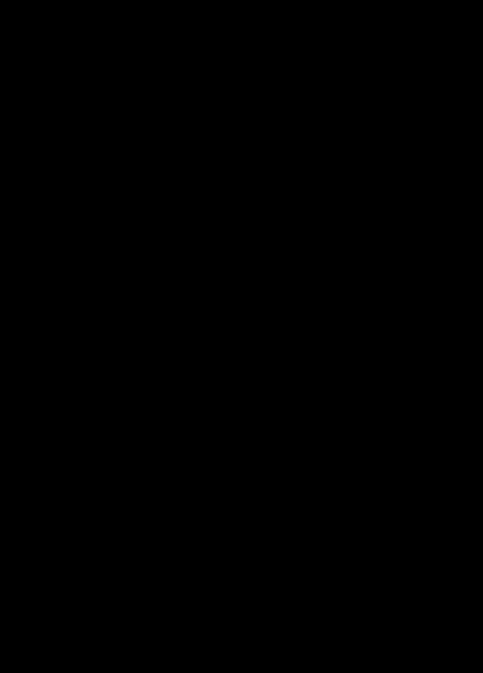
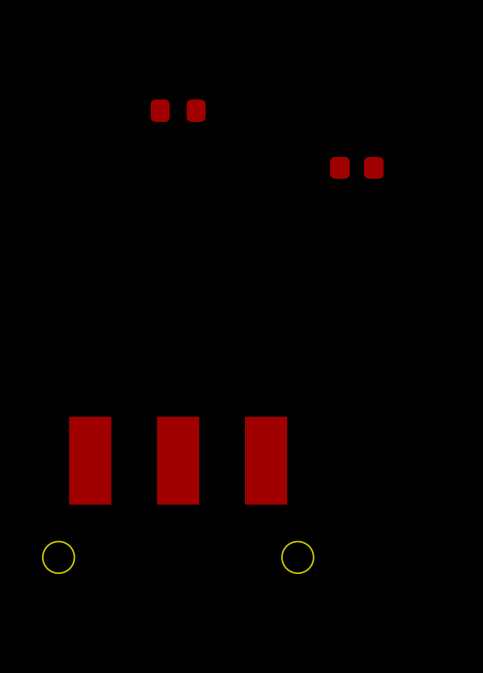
part: none -> (178, 110)
part: none -> (356, 167)
part: none -> (178, 494)

